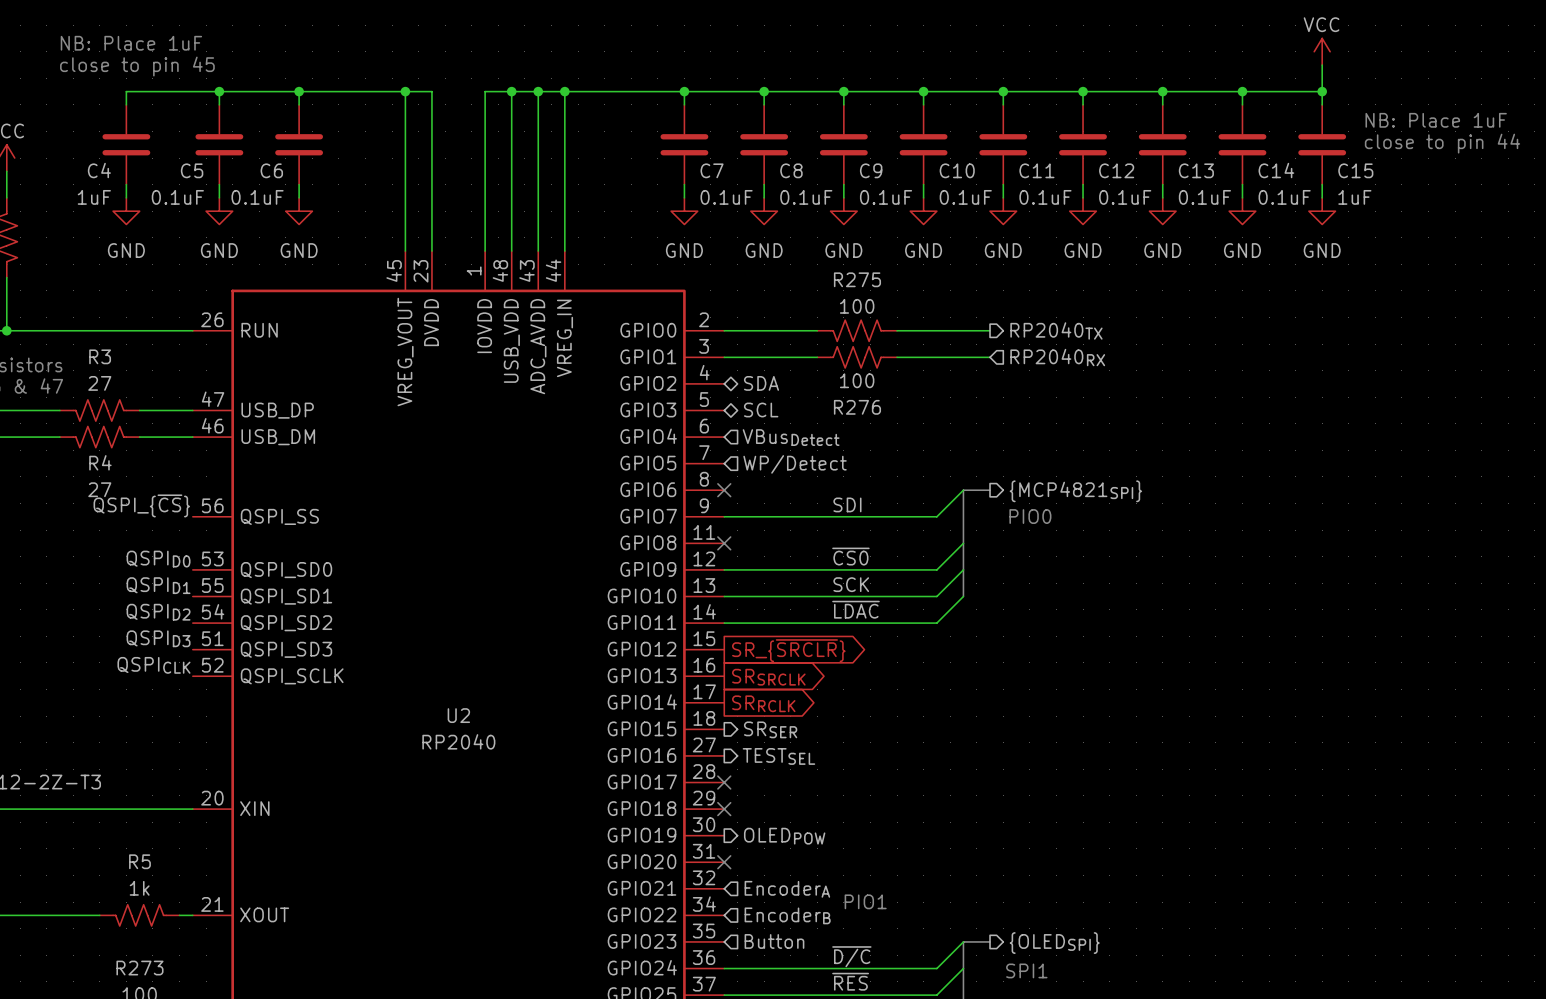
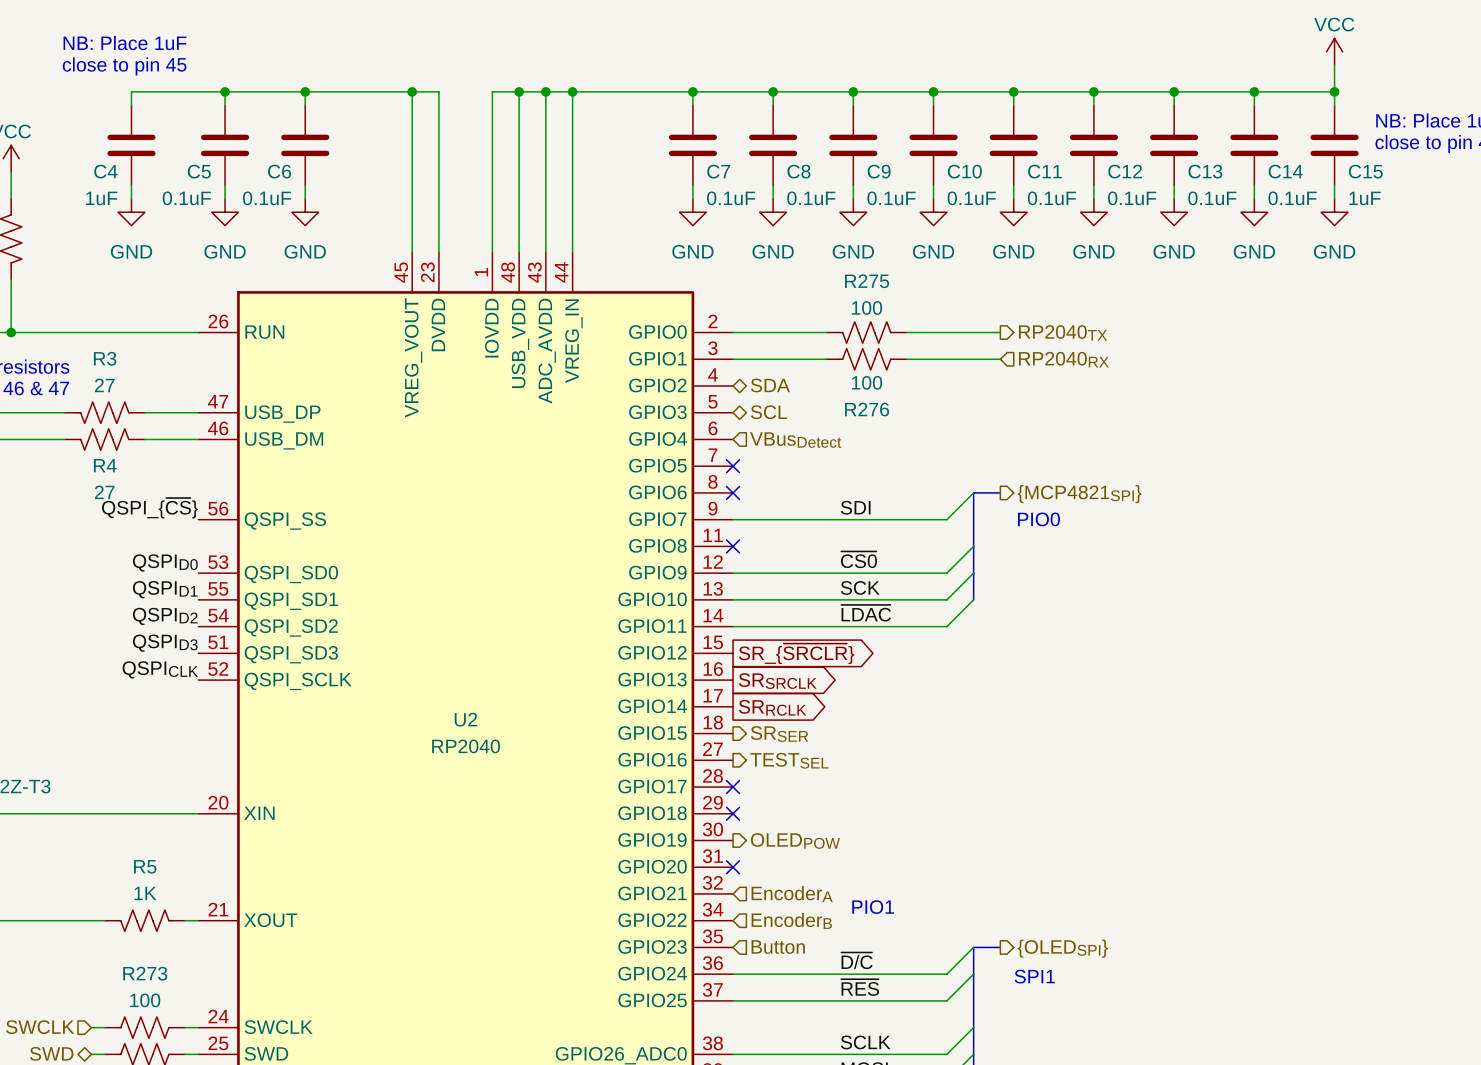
no-connect mark: none -> (733, 466)
hierarchical label: WP/Detect (795, 464) -> none
R5 value: 1k (139, 888) -> 1K (145, 893)

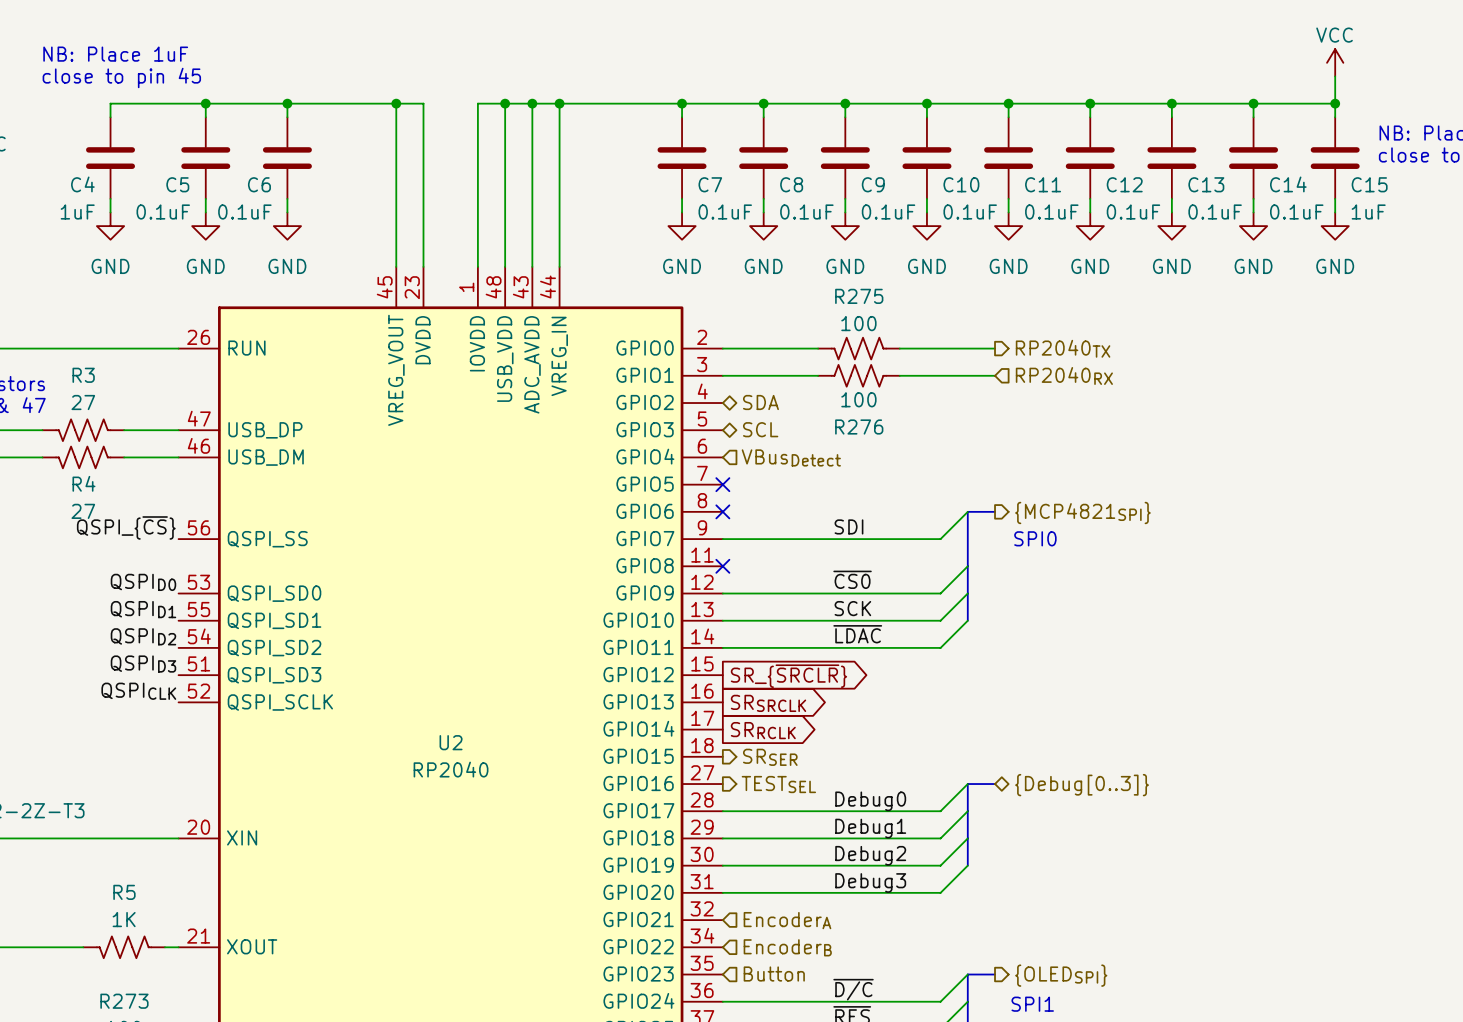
text: PIO0 (1038, 519) -> SPI0 (1035, 538)
wire: none -> (967, 784) (940, 811) (722, 811)
bus: none -> (995, 784) (967, 784) (967, 865)
hierarchical label: none -> {Debug[0..3]} (1082, 785)
label: none -> Debug0 (870, 801)
no-connect mark: (733, 787) -> none
wire: none -> (967, 811) (940, 838) (722, 838)
label: none -> Debug1 (870, 828)
no-connect mark: (733, 813) -> none
wire: none -> (967, 838) (940, 865) (722, 865)
label: none -> Debug2 (870, 855)
hierarchical label: OLEDPOW (795, 840) -> none
wire: none -> (967, 865) (940, 892) (722, 892)
label: none -> Debug3 (870, 883)
no-connect mark: (733, 867) -> none
text: PIO1 (873, 907) -> none

